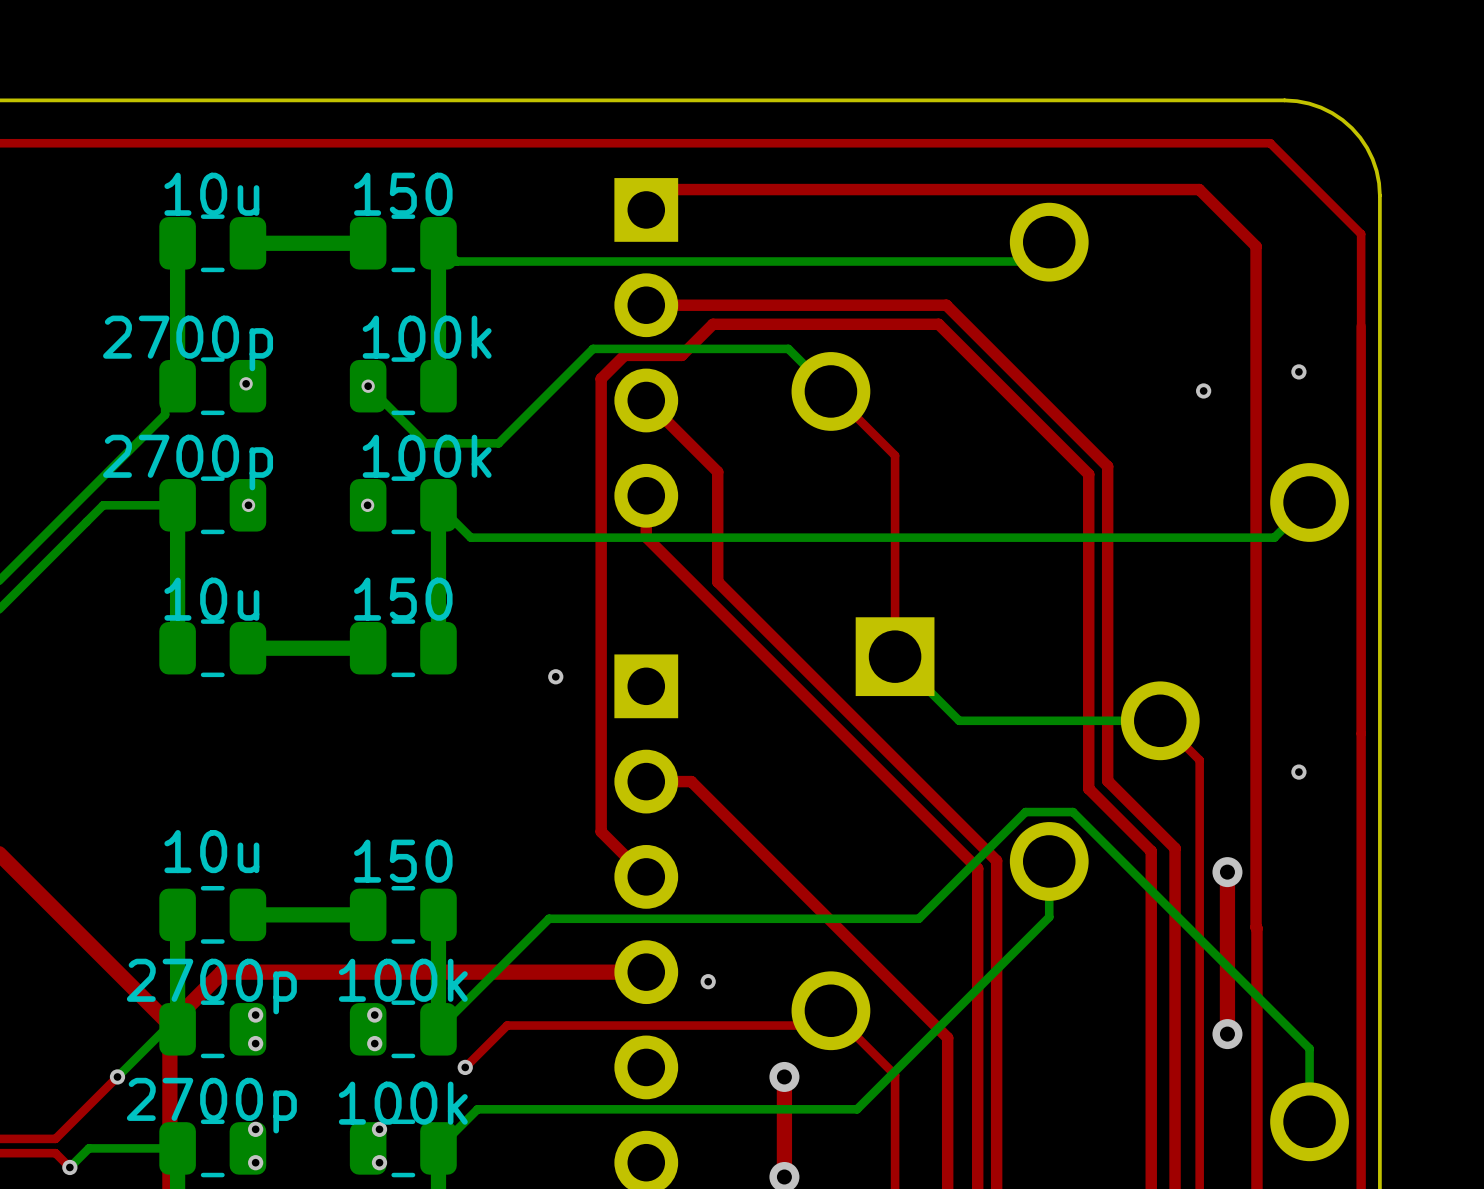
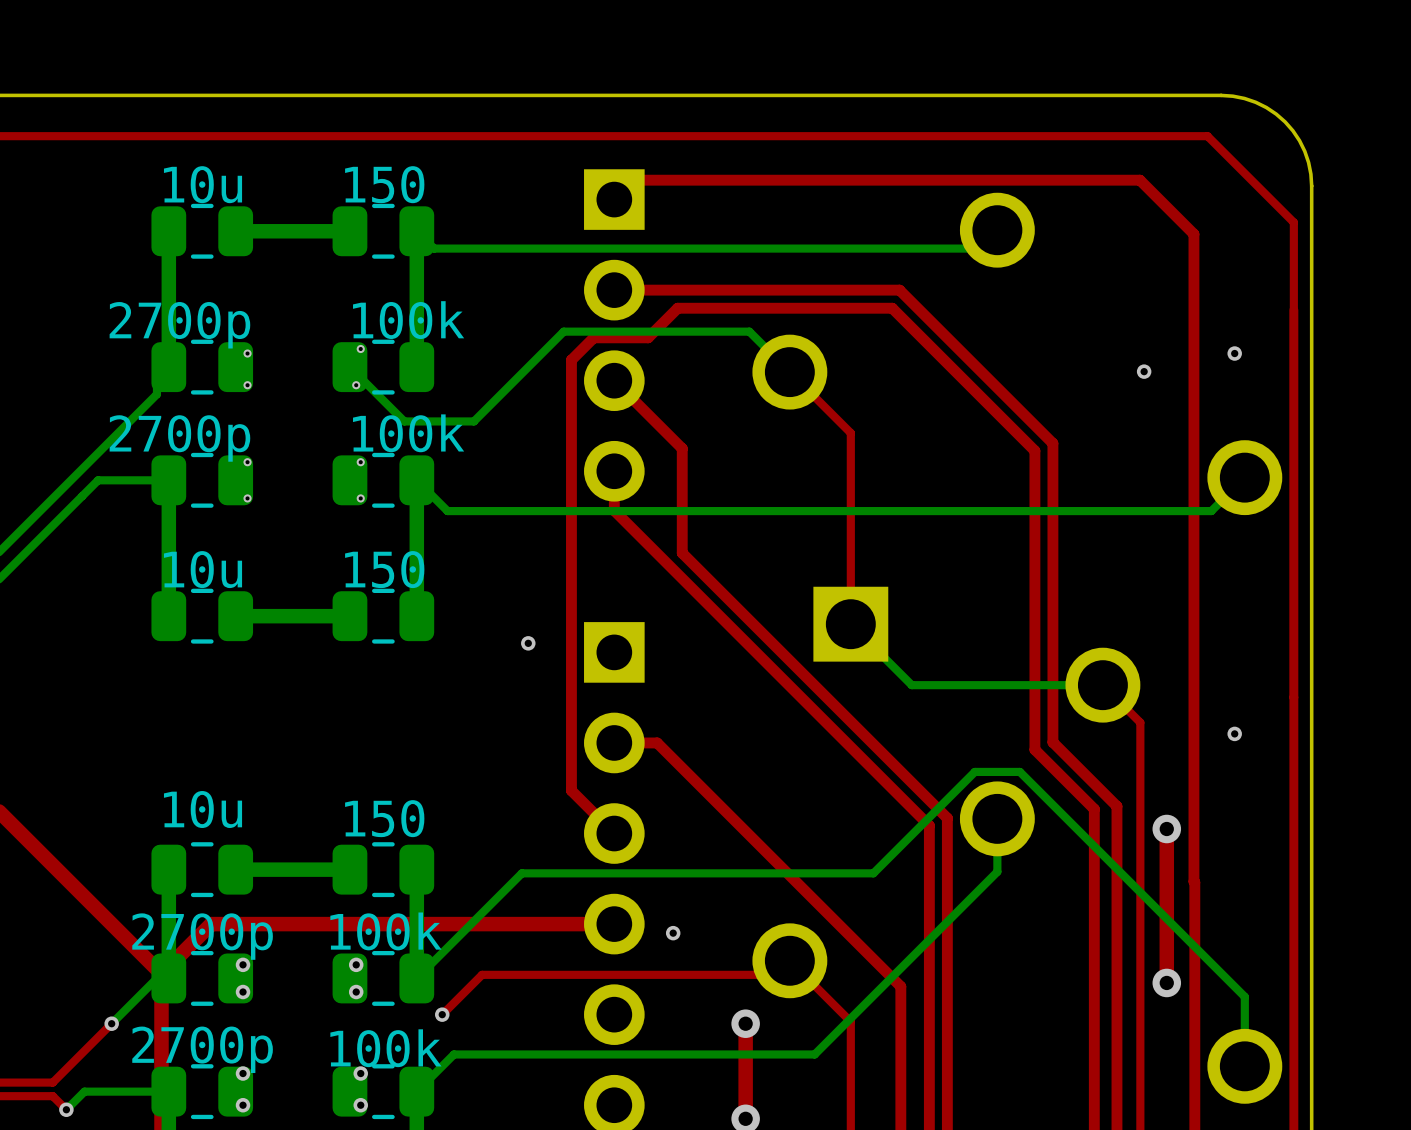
via: none -> (360, 349)
via: none -> (247, 353)
via: (246, 383) -> none
via: (368, 386) -> none
via: none -> (247, 385)
via: none -> (356, 385)
via: none -> (247, 462)
via: none -> (360, 462)
via: (248, 505) -> none
via: (367, 505) -> none
via: none -> (247, 498)
via: none -> (360, 498)

